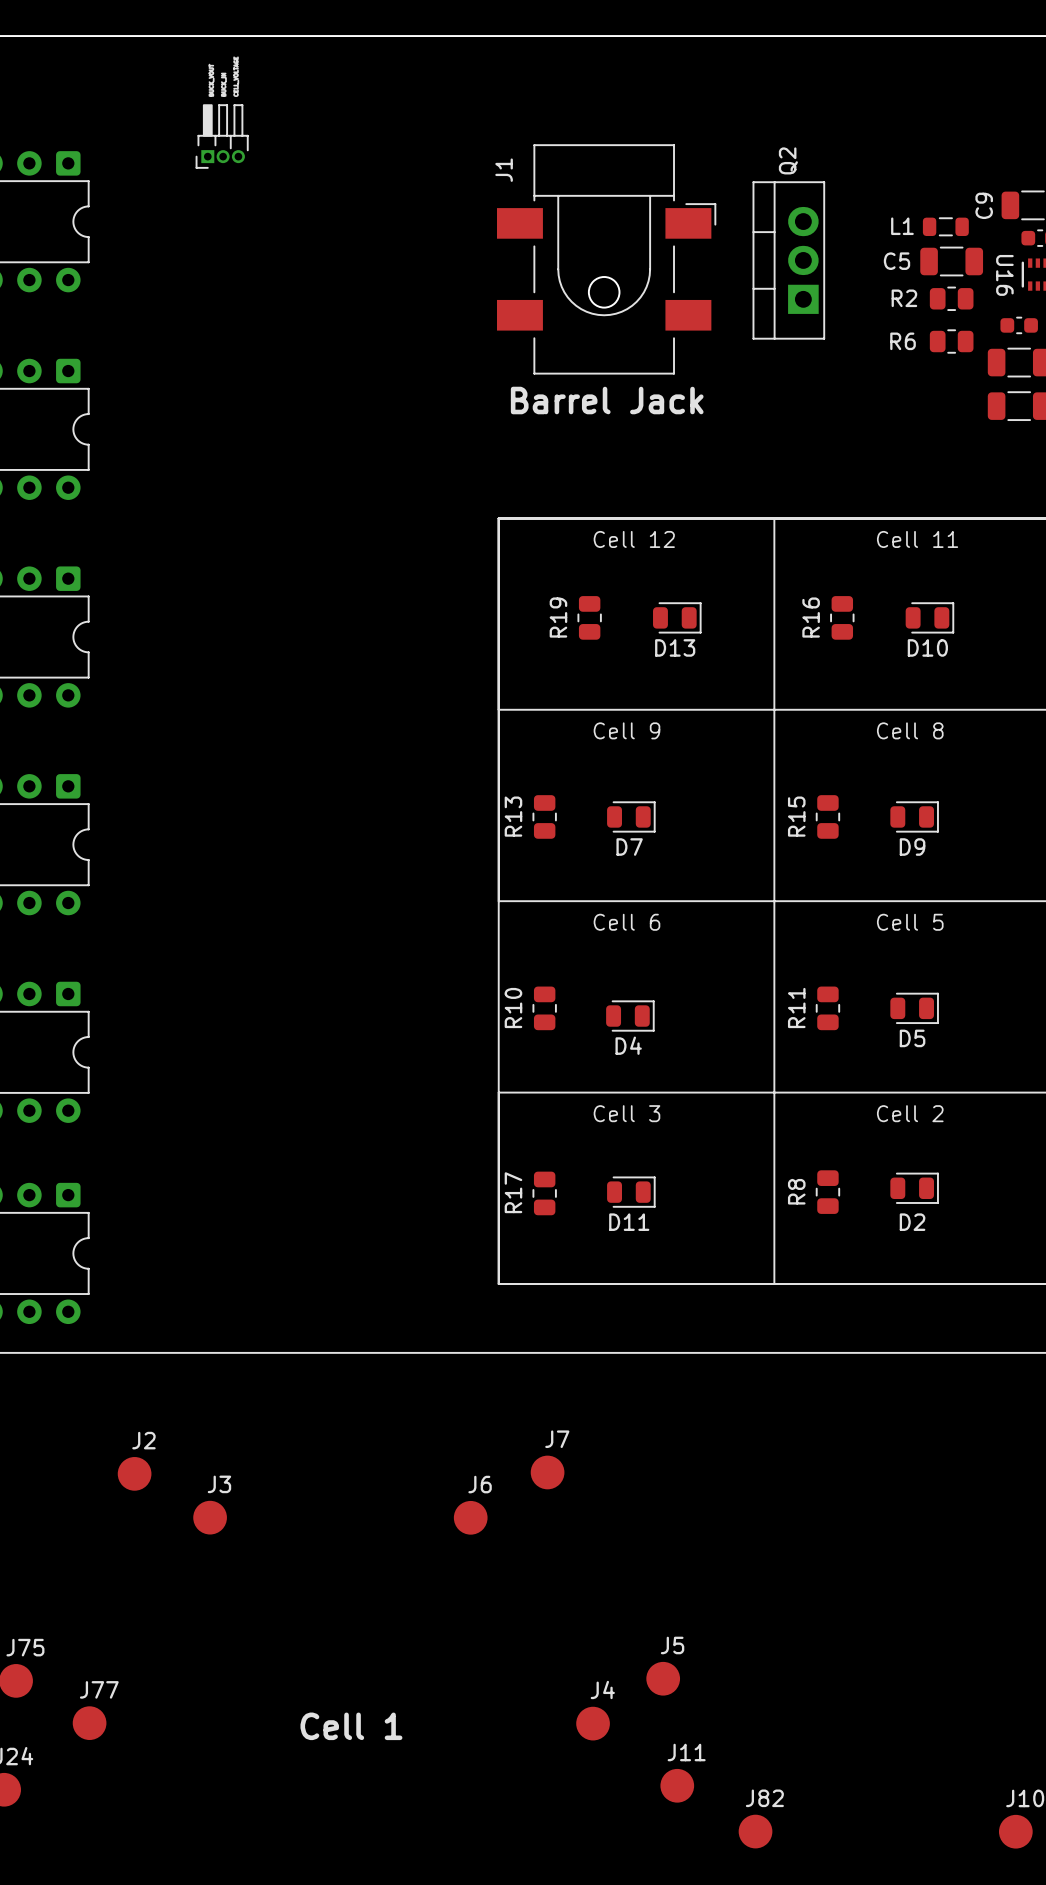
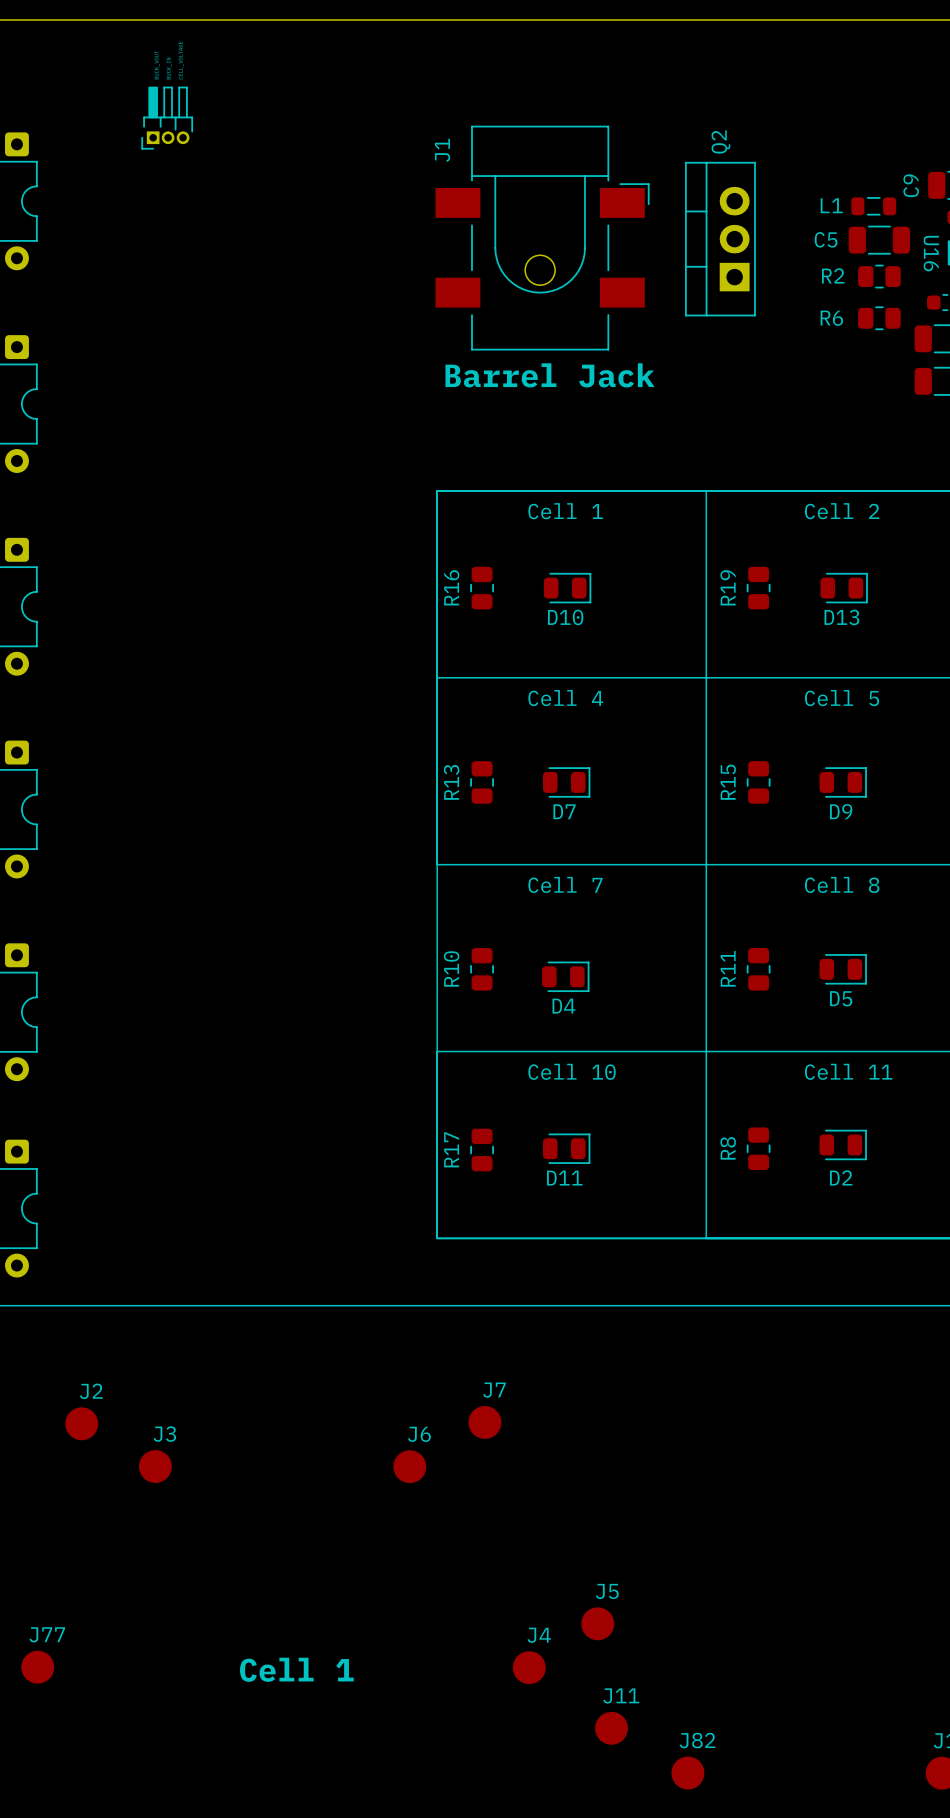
text: Cell 12 (634, 539) -> Cell 1 (565, 511)
text: Cell 11 (917, 539) -> Cell 2 (842, 511)
R19 position: (589, 617) -> (758, 588)
D13 position: (677, 617) -> (844, 588)
R16 position: (842, 617) -> (482, 588)
D10 position: (929, 617) -> (567, 588)
text: Cell 9 (626, 730) -> Cell 4 (565, 698)
text: Cell 8 (910, 730) -> Cell 5 (842, 698)
text: Cell 6 (626, 922) -> Cell 7 (565, 884)
text: Cell 5 (910, 922) -> Cell 8 (842, 884)
text: Cell 3 (626, 1113) -> Cell 10 (572, 1071)
text: Cell 2 (910, 1113) -> Cell 11 (848, 1071)

